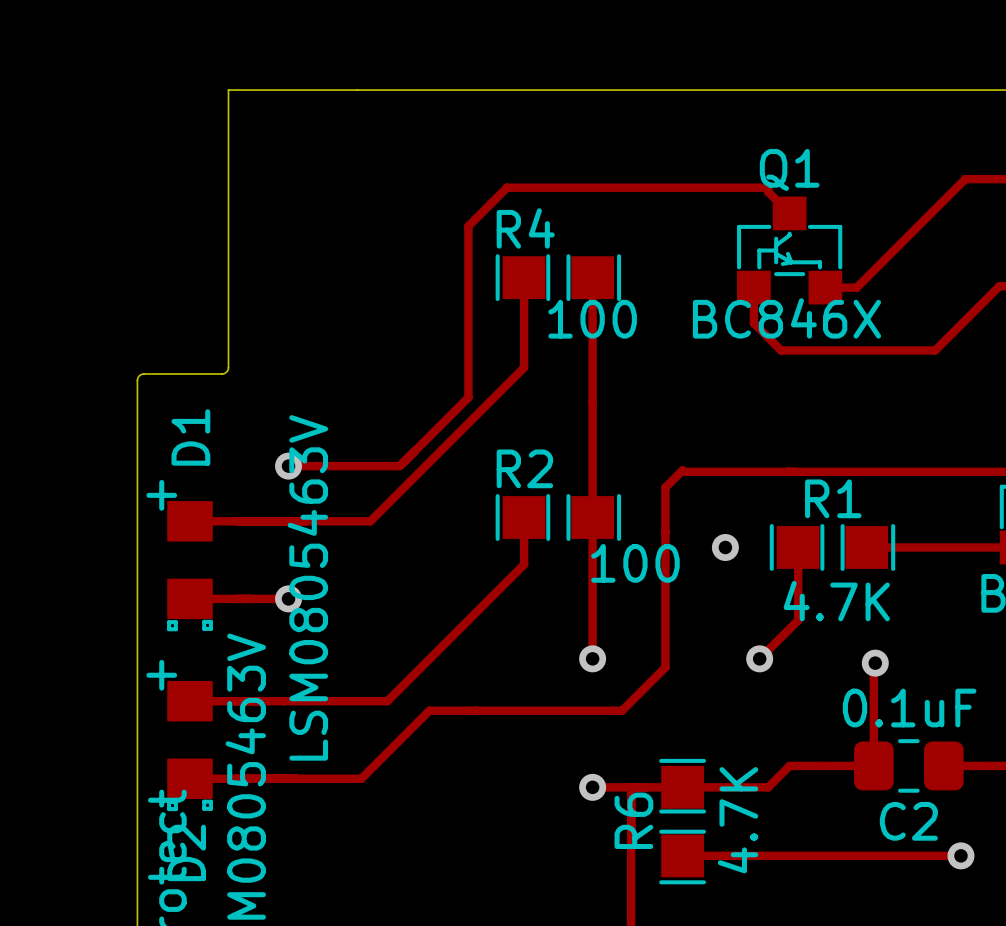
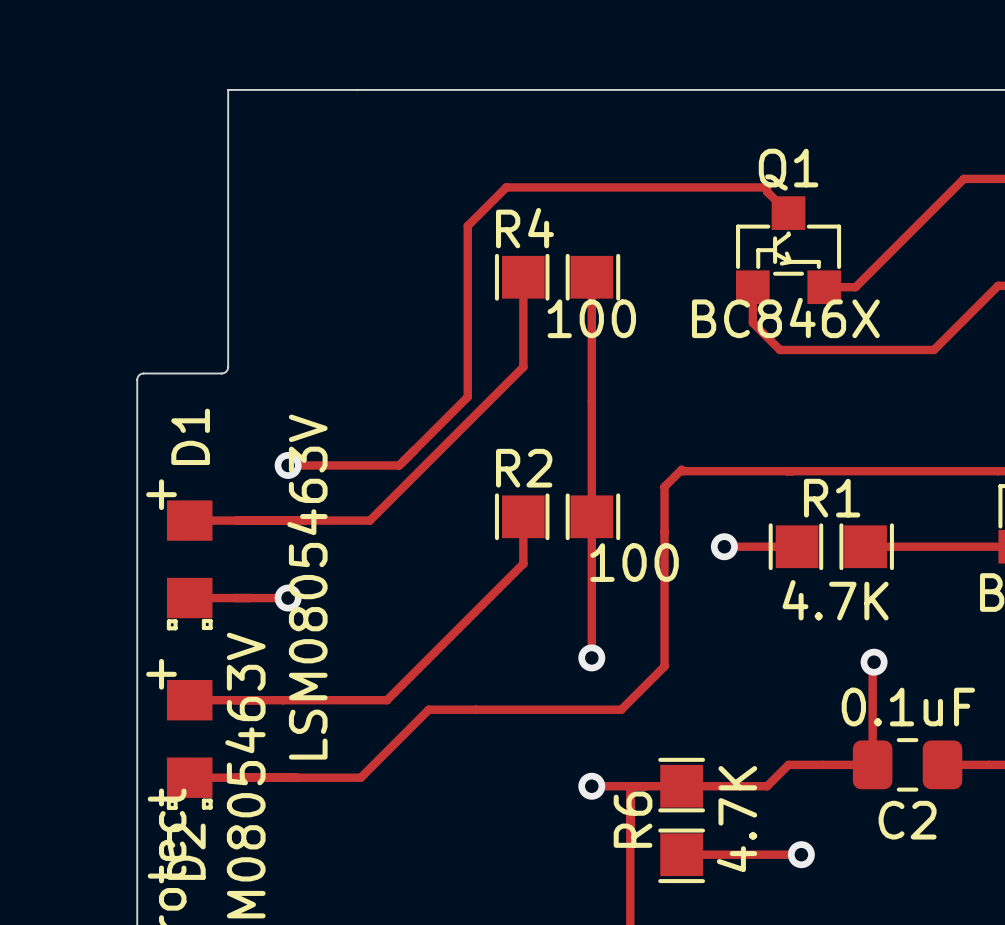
track: (798, 547) (798, 620) (759, 658) -> (797, 546) (724, 546)
via: (759, 658) -> none
track: (802, 855) (960, 855) -> none
via: none -> (801, 854)
via: (960, 855) -> none

